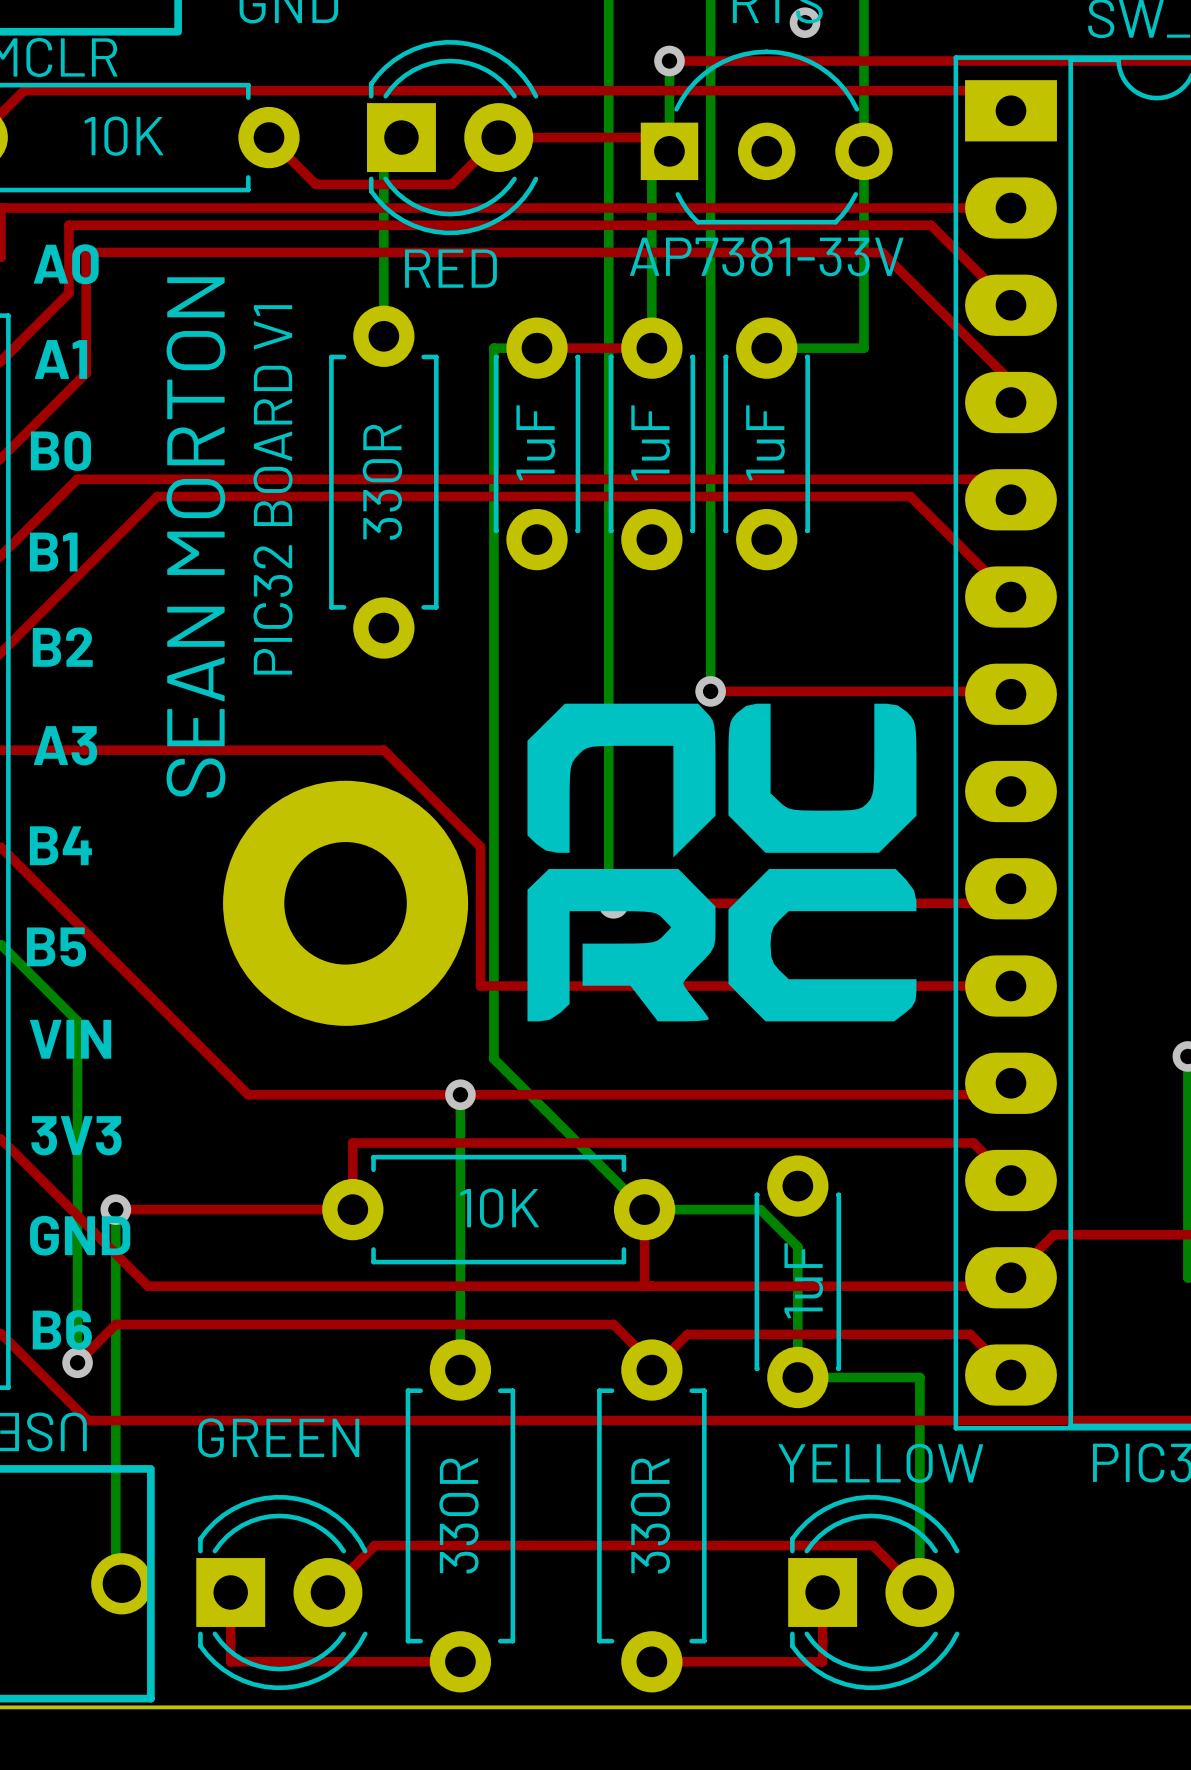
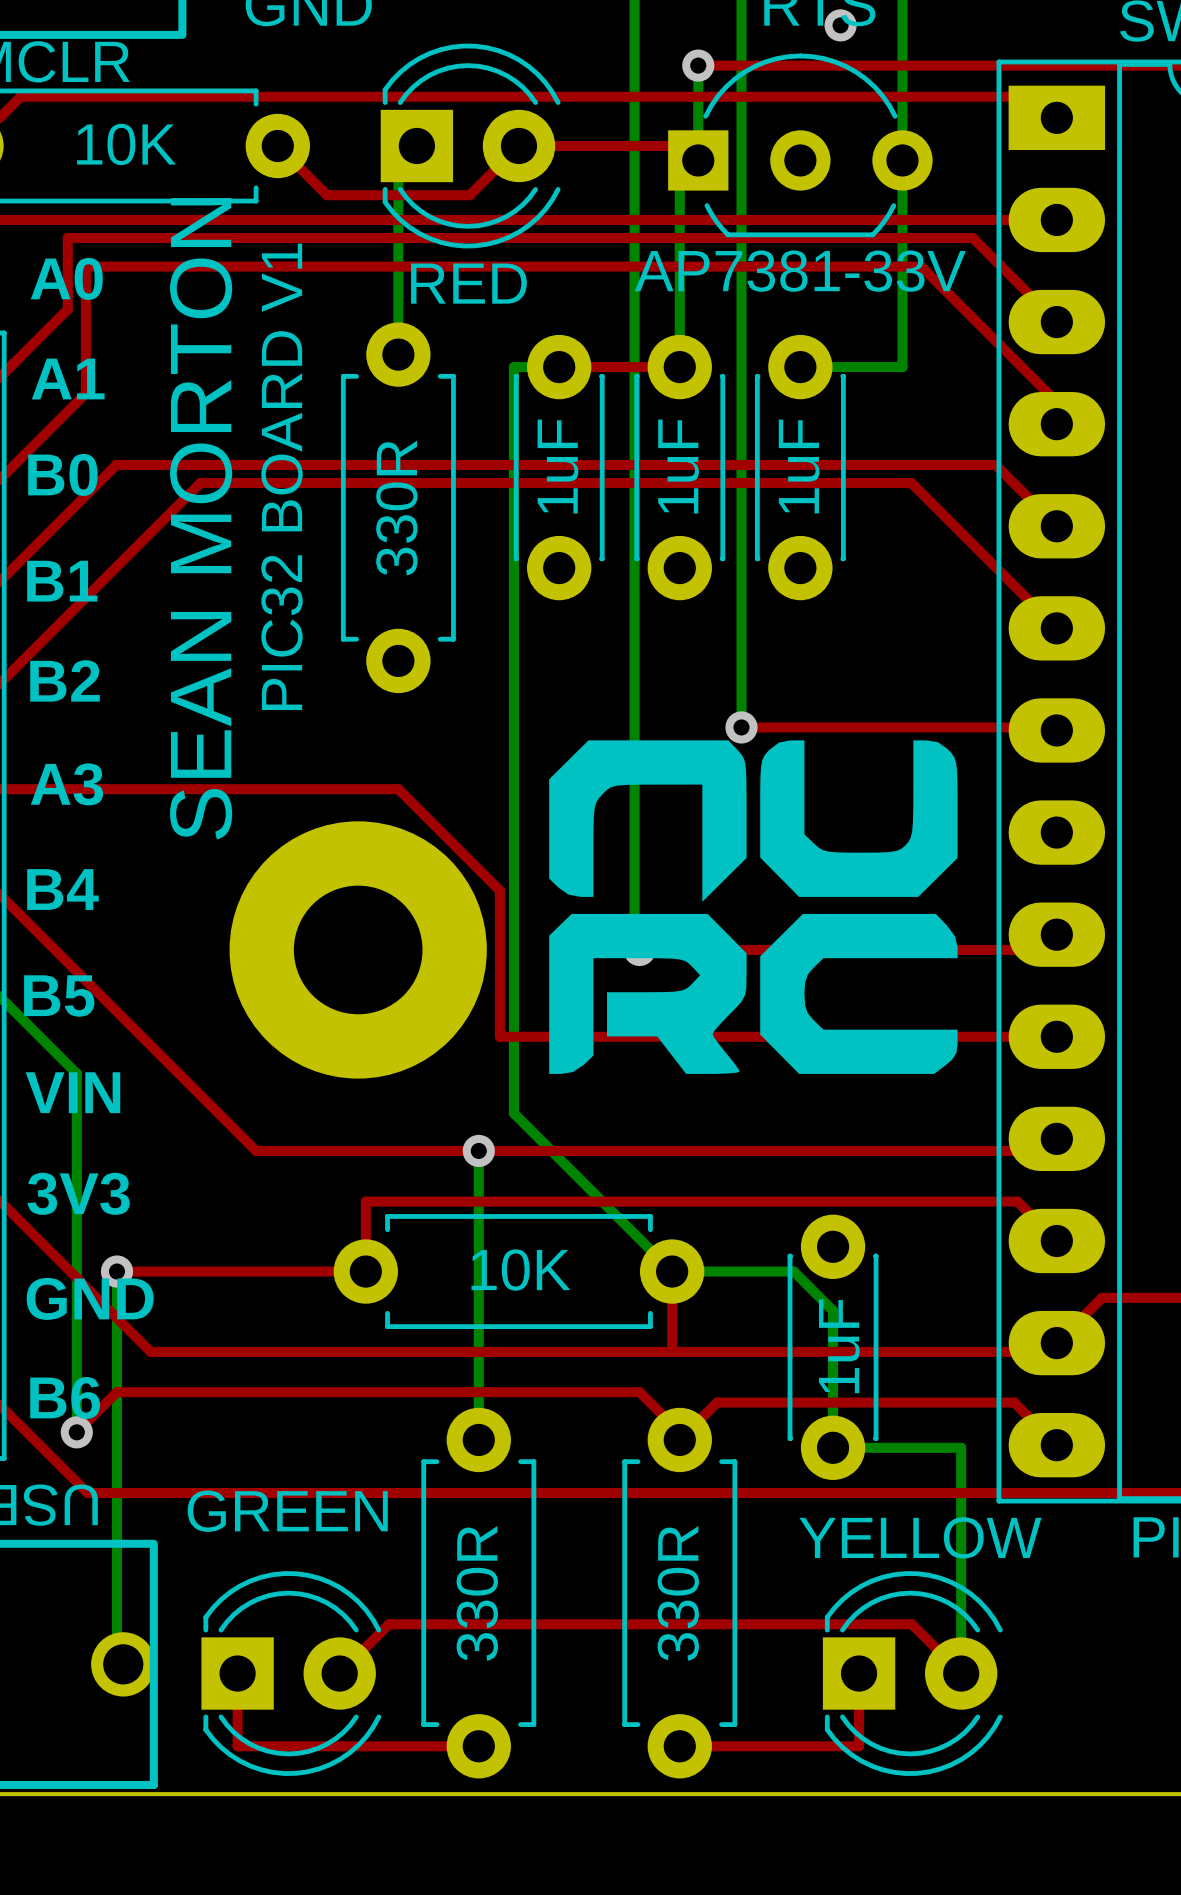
top track: (77, 479) (990, 479) -> (76, 504) (116, 464) (995, 464) (1035, 504)
top track: (157, 496) (910, 496) -> (160, 522) (200, 483) (911, 483) (951, 522)

